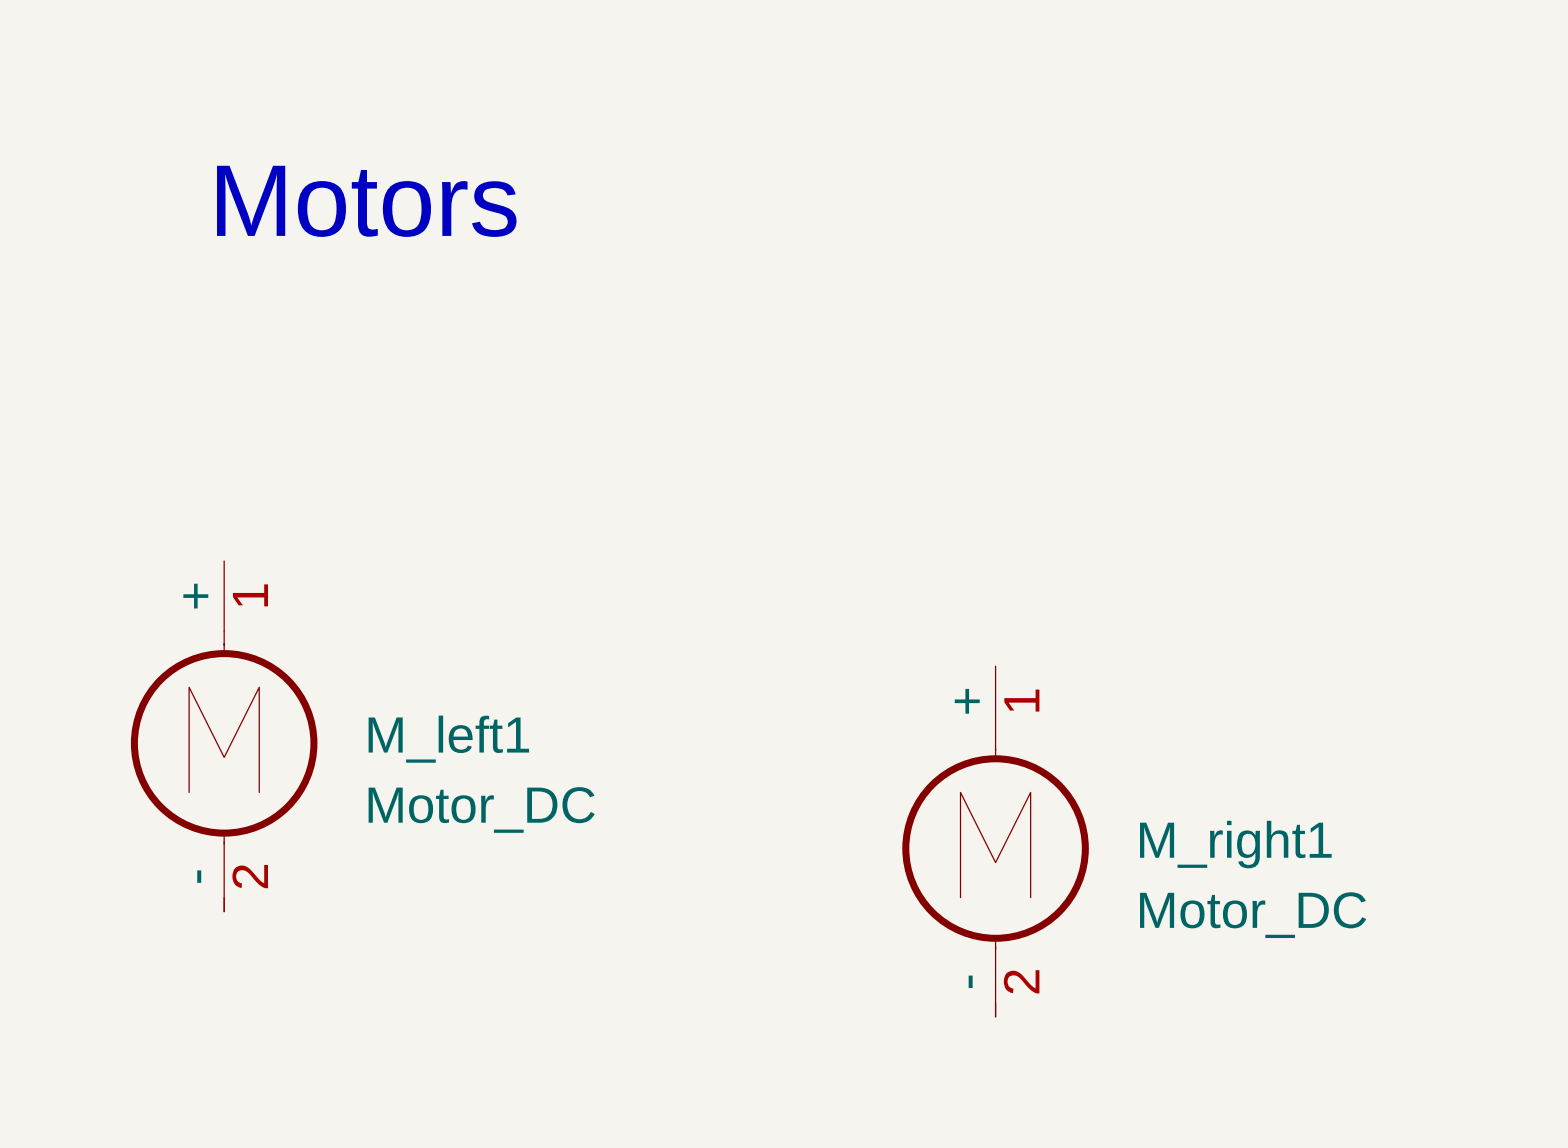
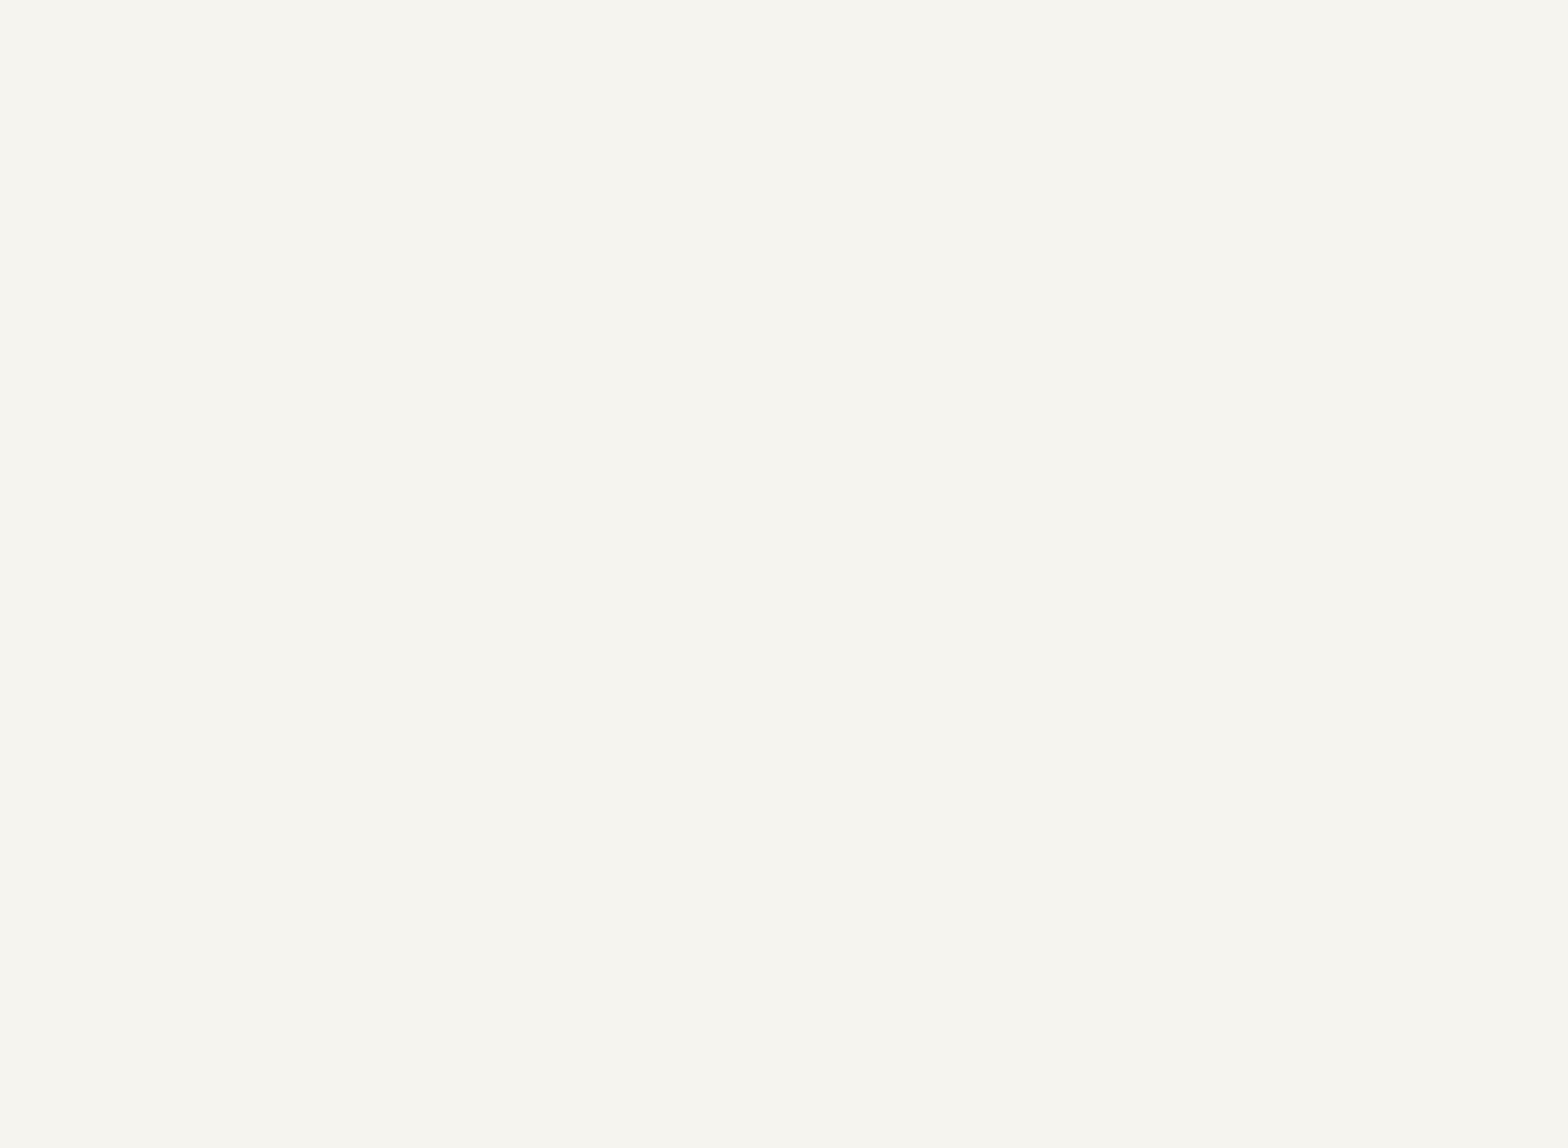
text: Motors (366, 201) -> none
M_left1: Motor_DC (224, 736) -> none
M_right1: Motor_DC (995, 841) -> none

